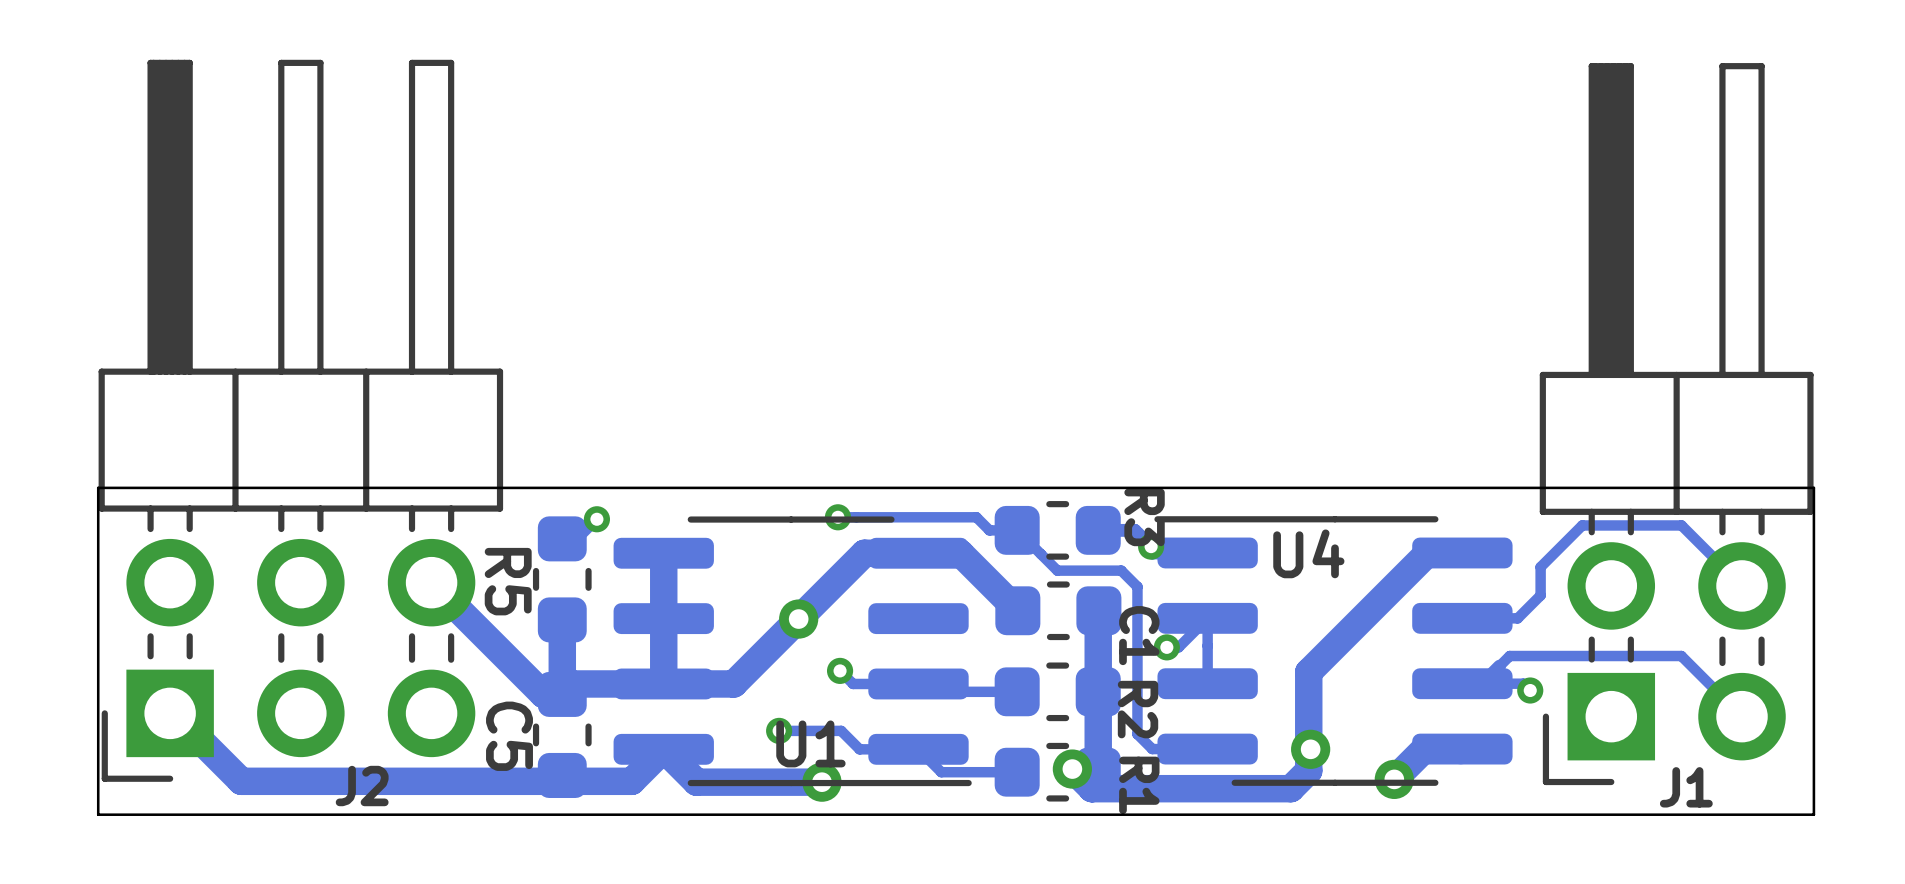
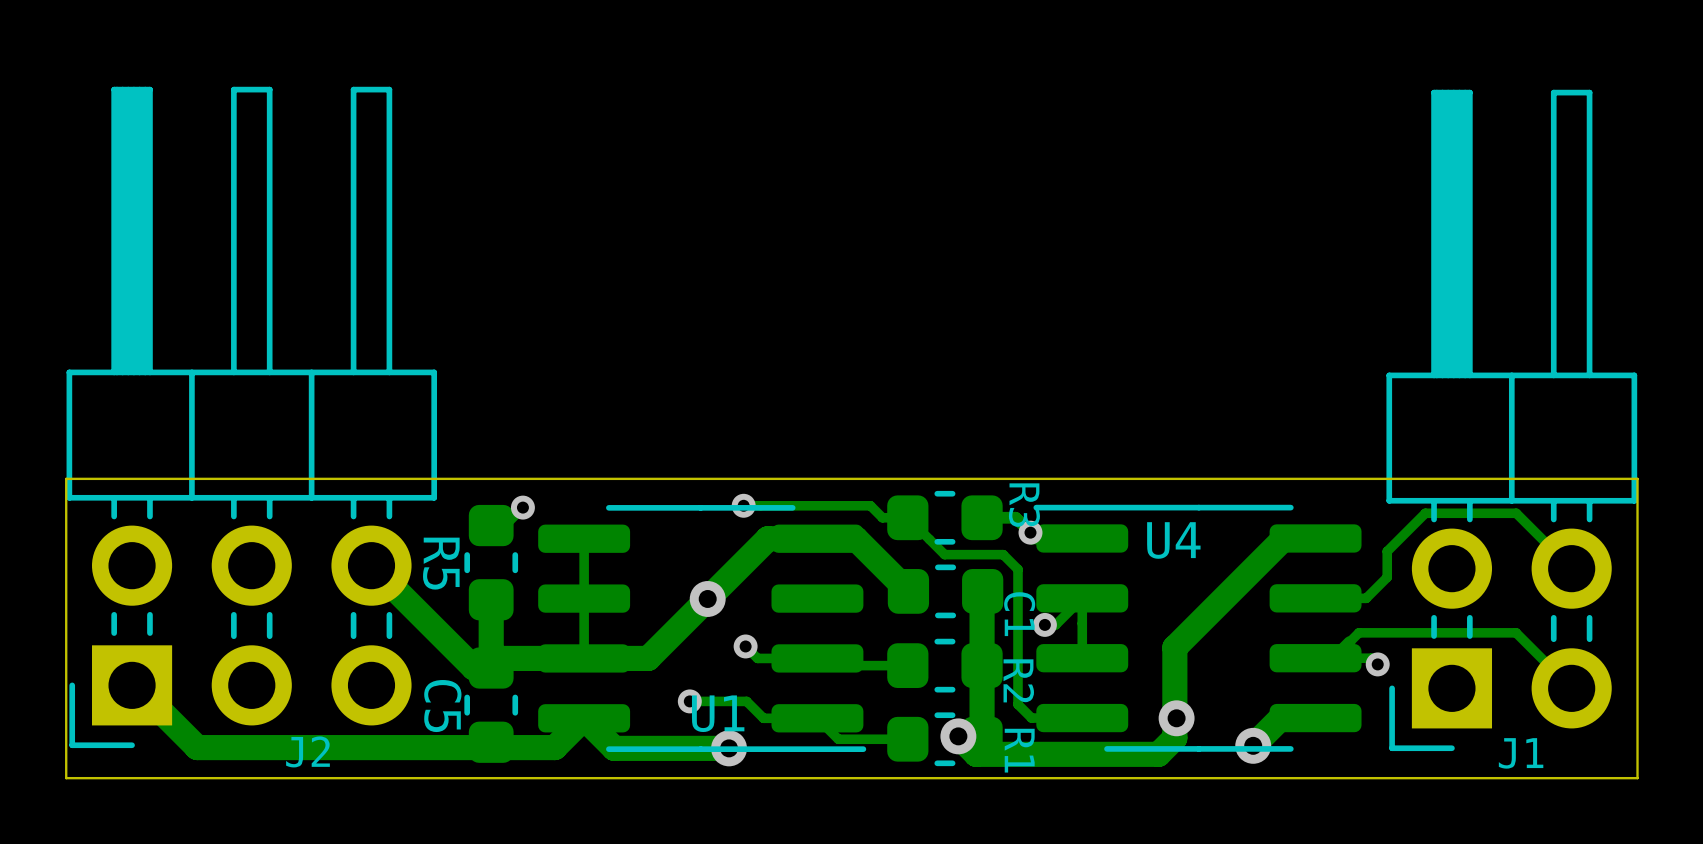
track width: thick (663, 553) (663, 683) -> thin (584, 538) (584, 658)

